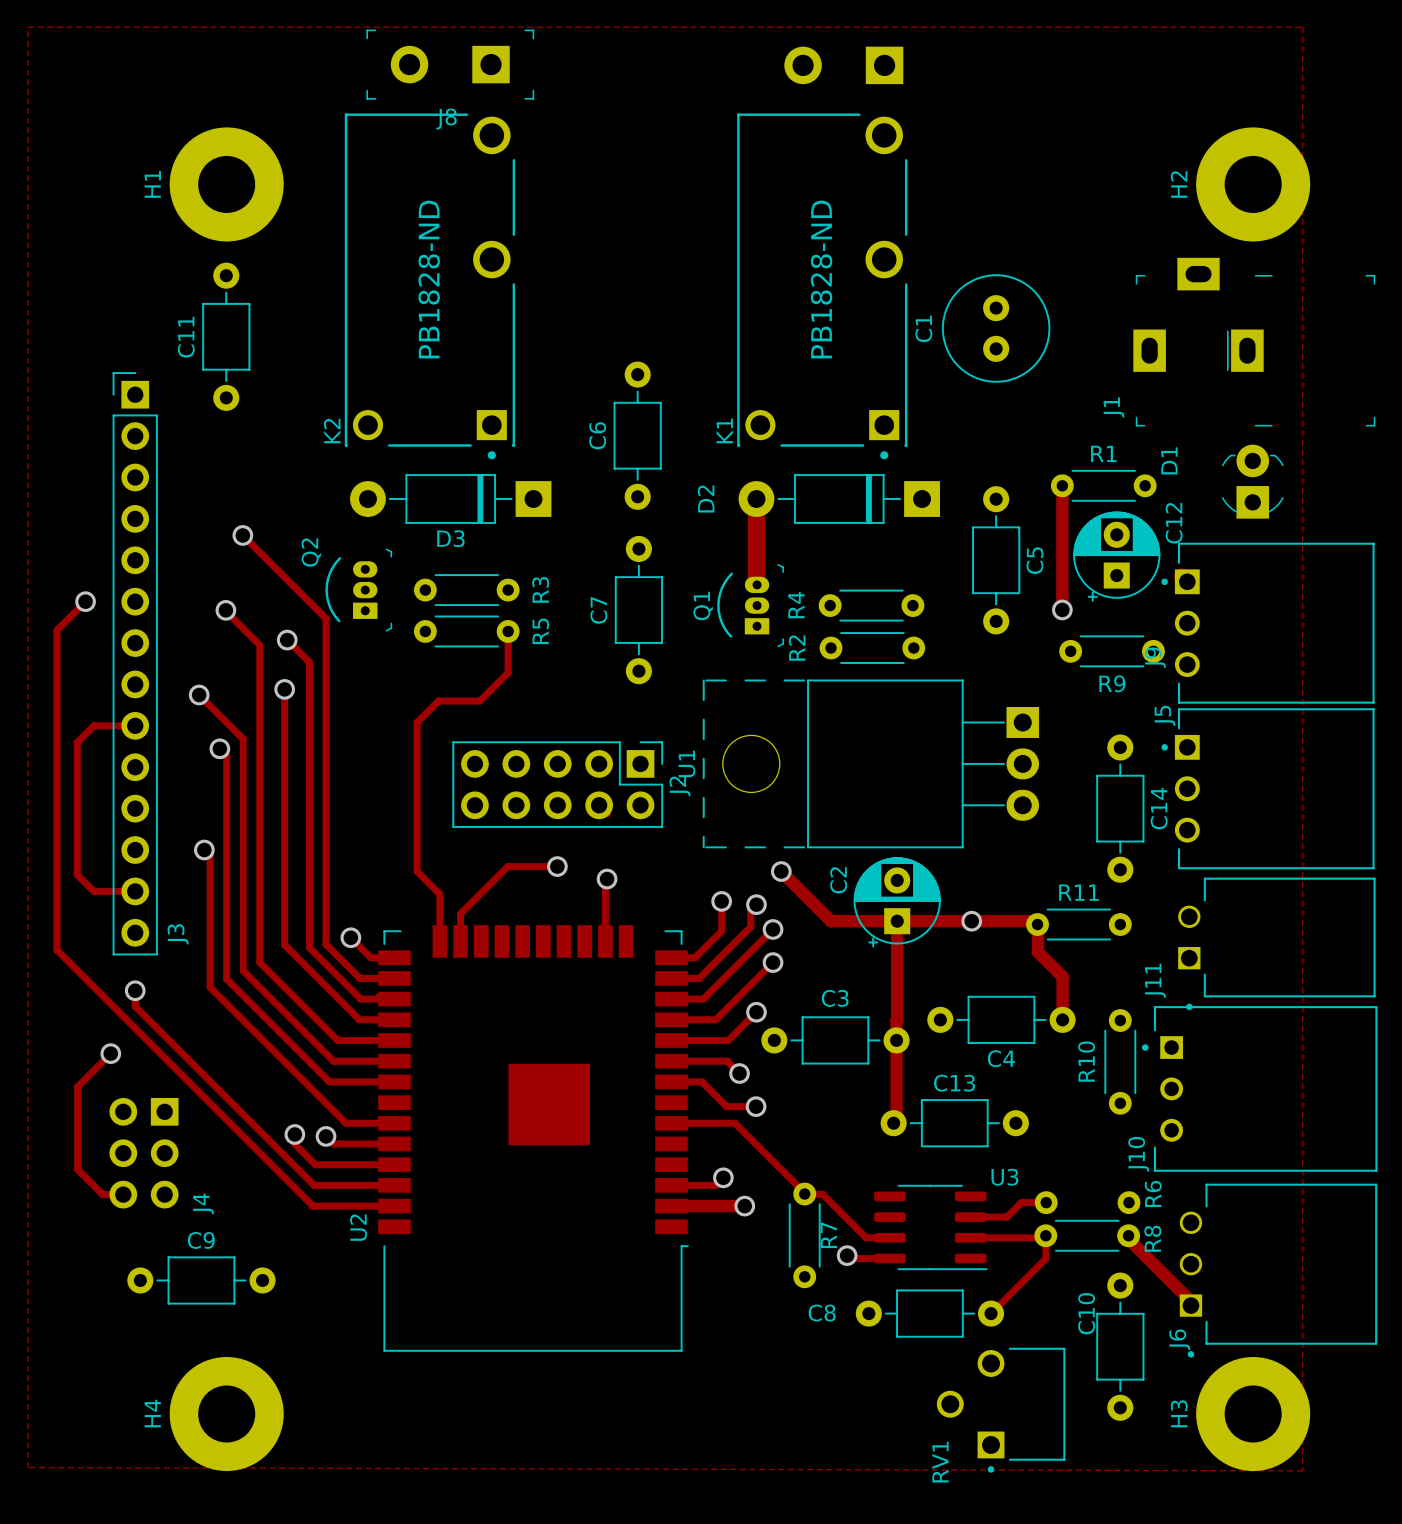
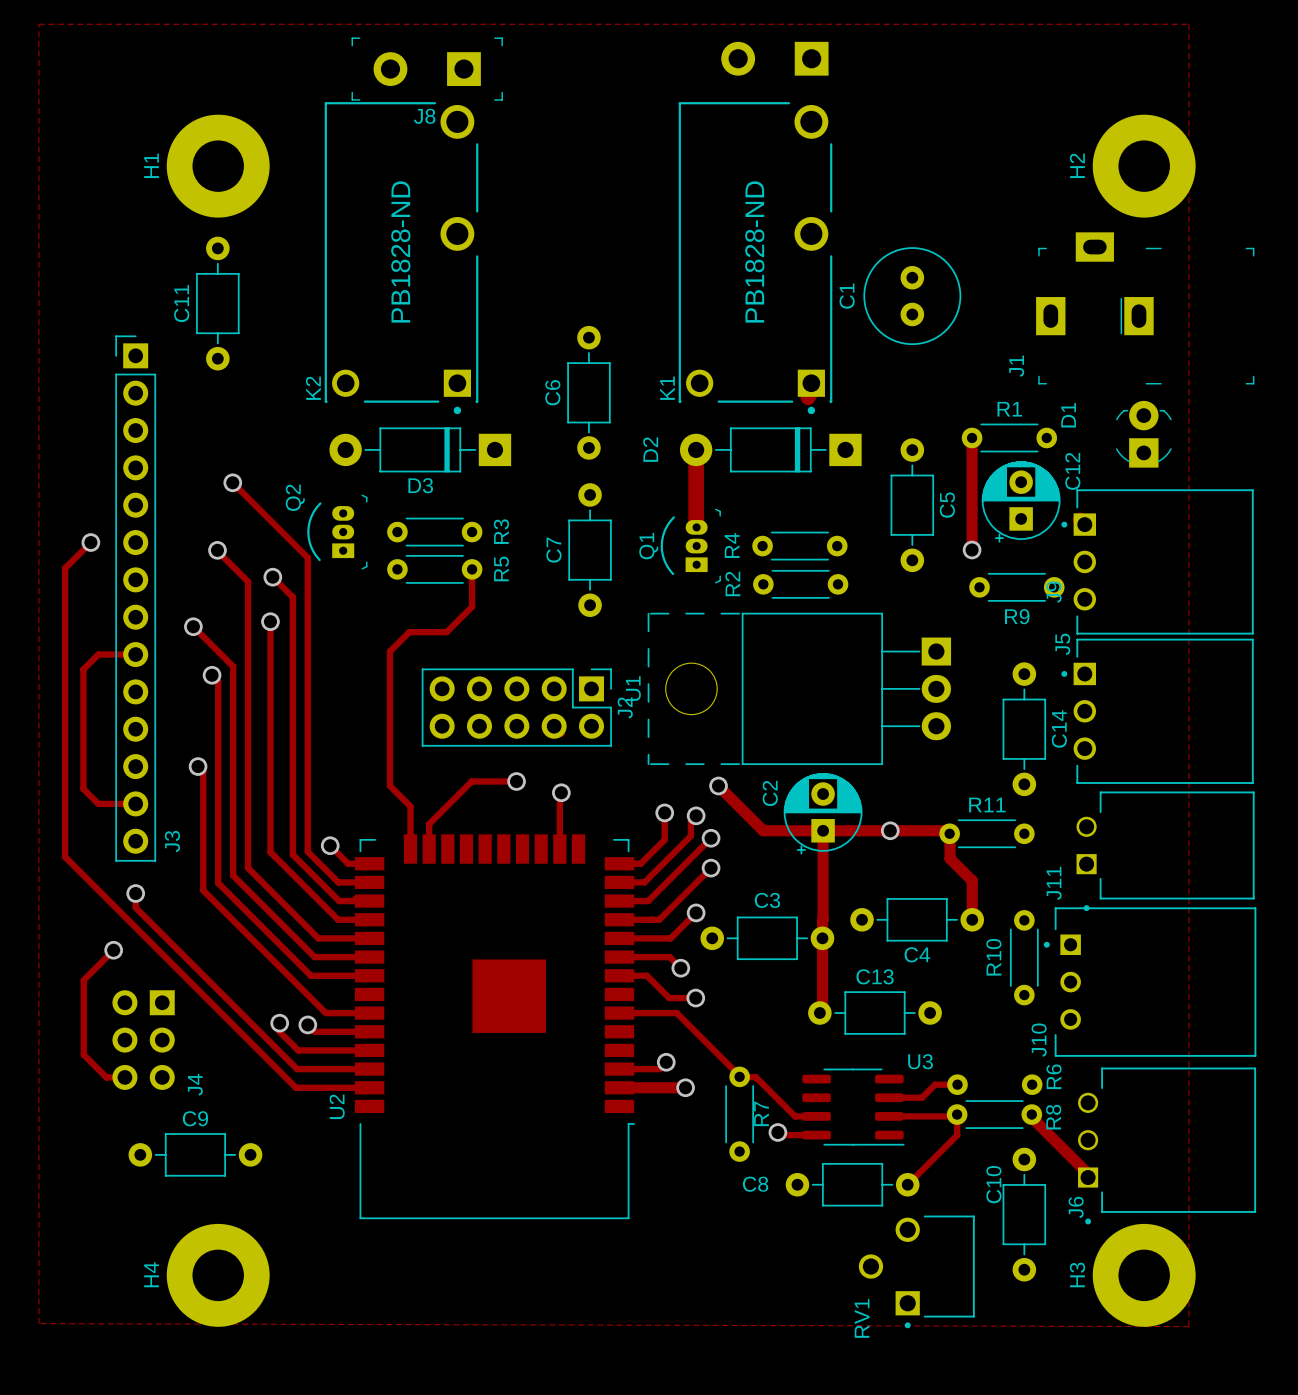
J8 position: (450, 64) -> (427, 69)
track: none -> (811, 395) (808, 397)

